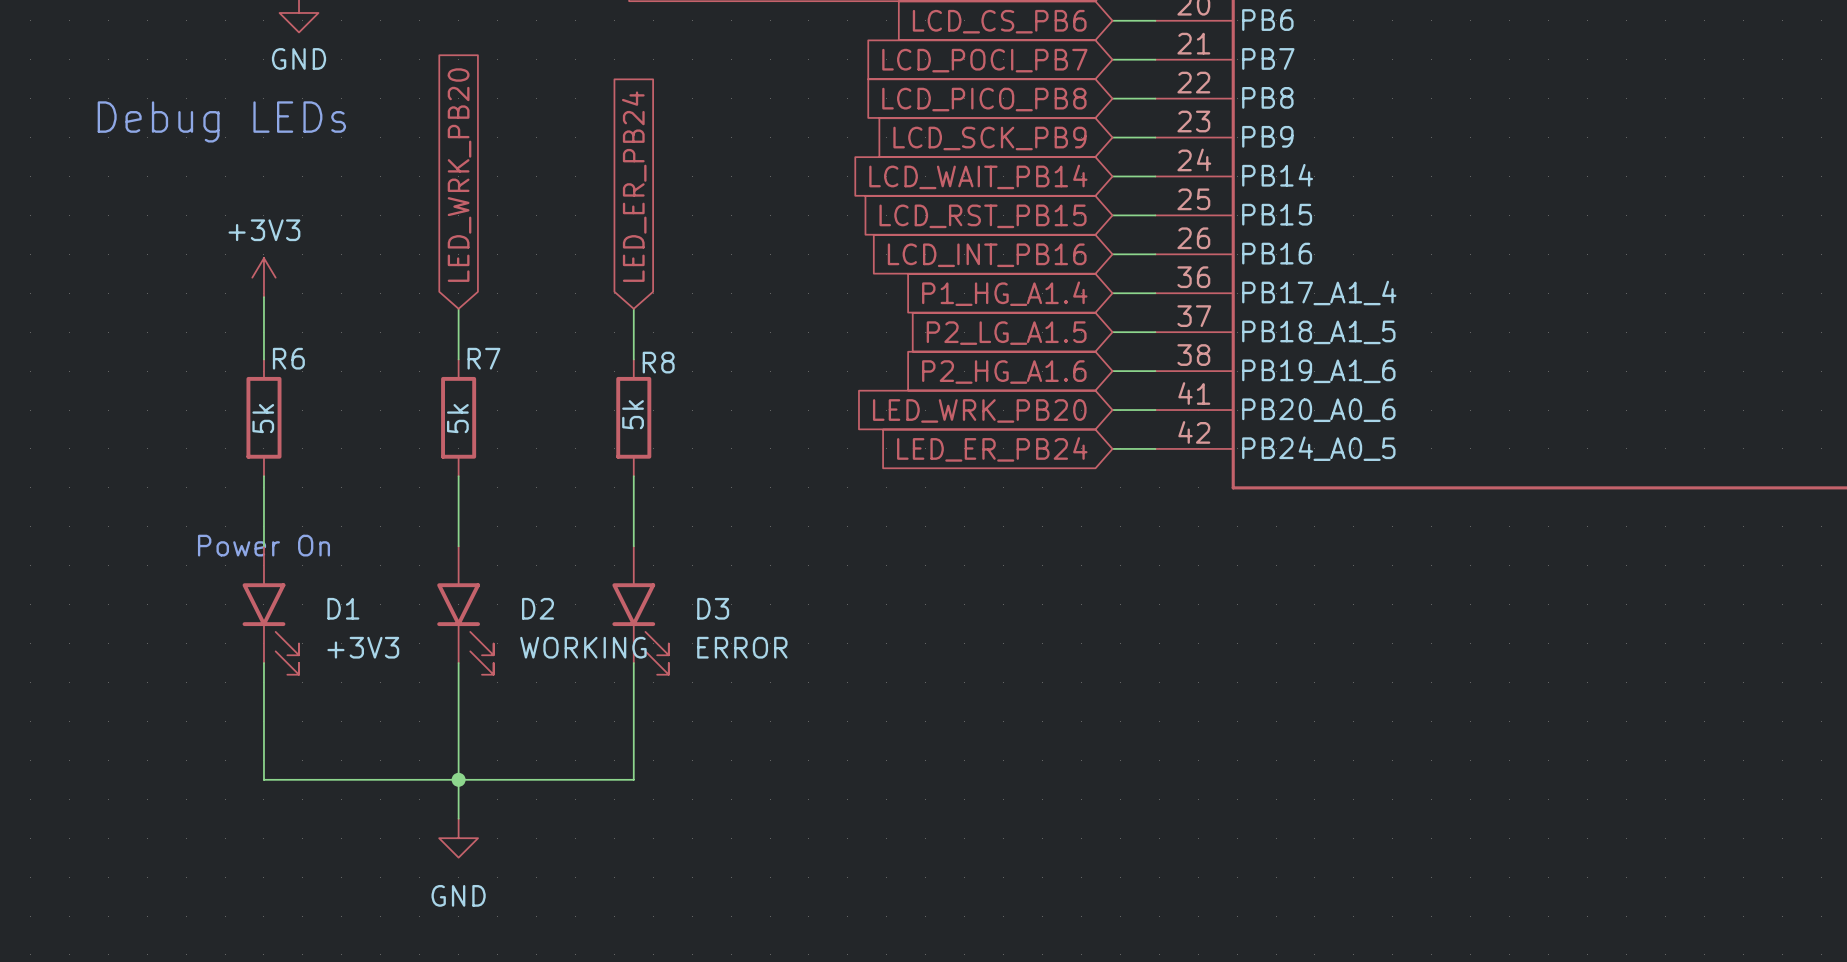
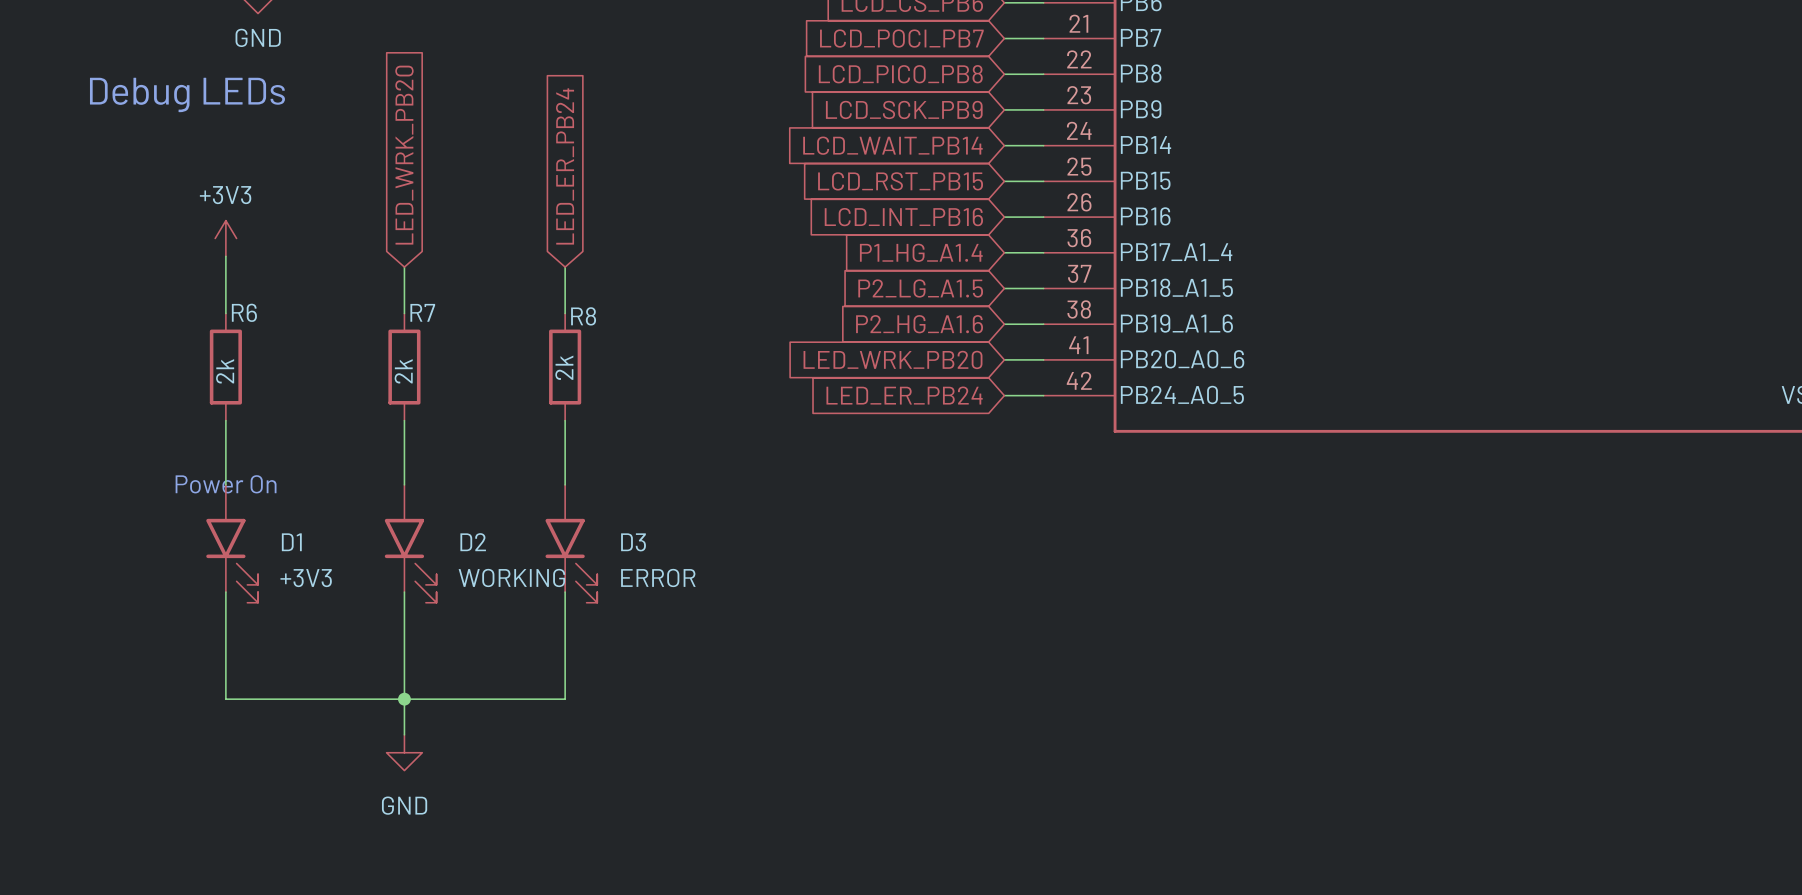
R8 value: 5k (633, 414) -> 2k (564, 367)
R6 value: 5k (263, 418) -> 2k (225, 371)
R7 value: 5k (457, 418) -> 2k (403, 371)

